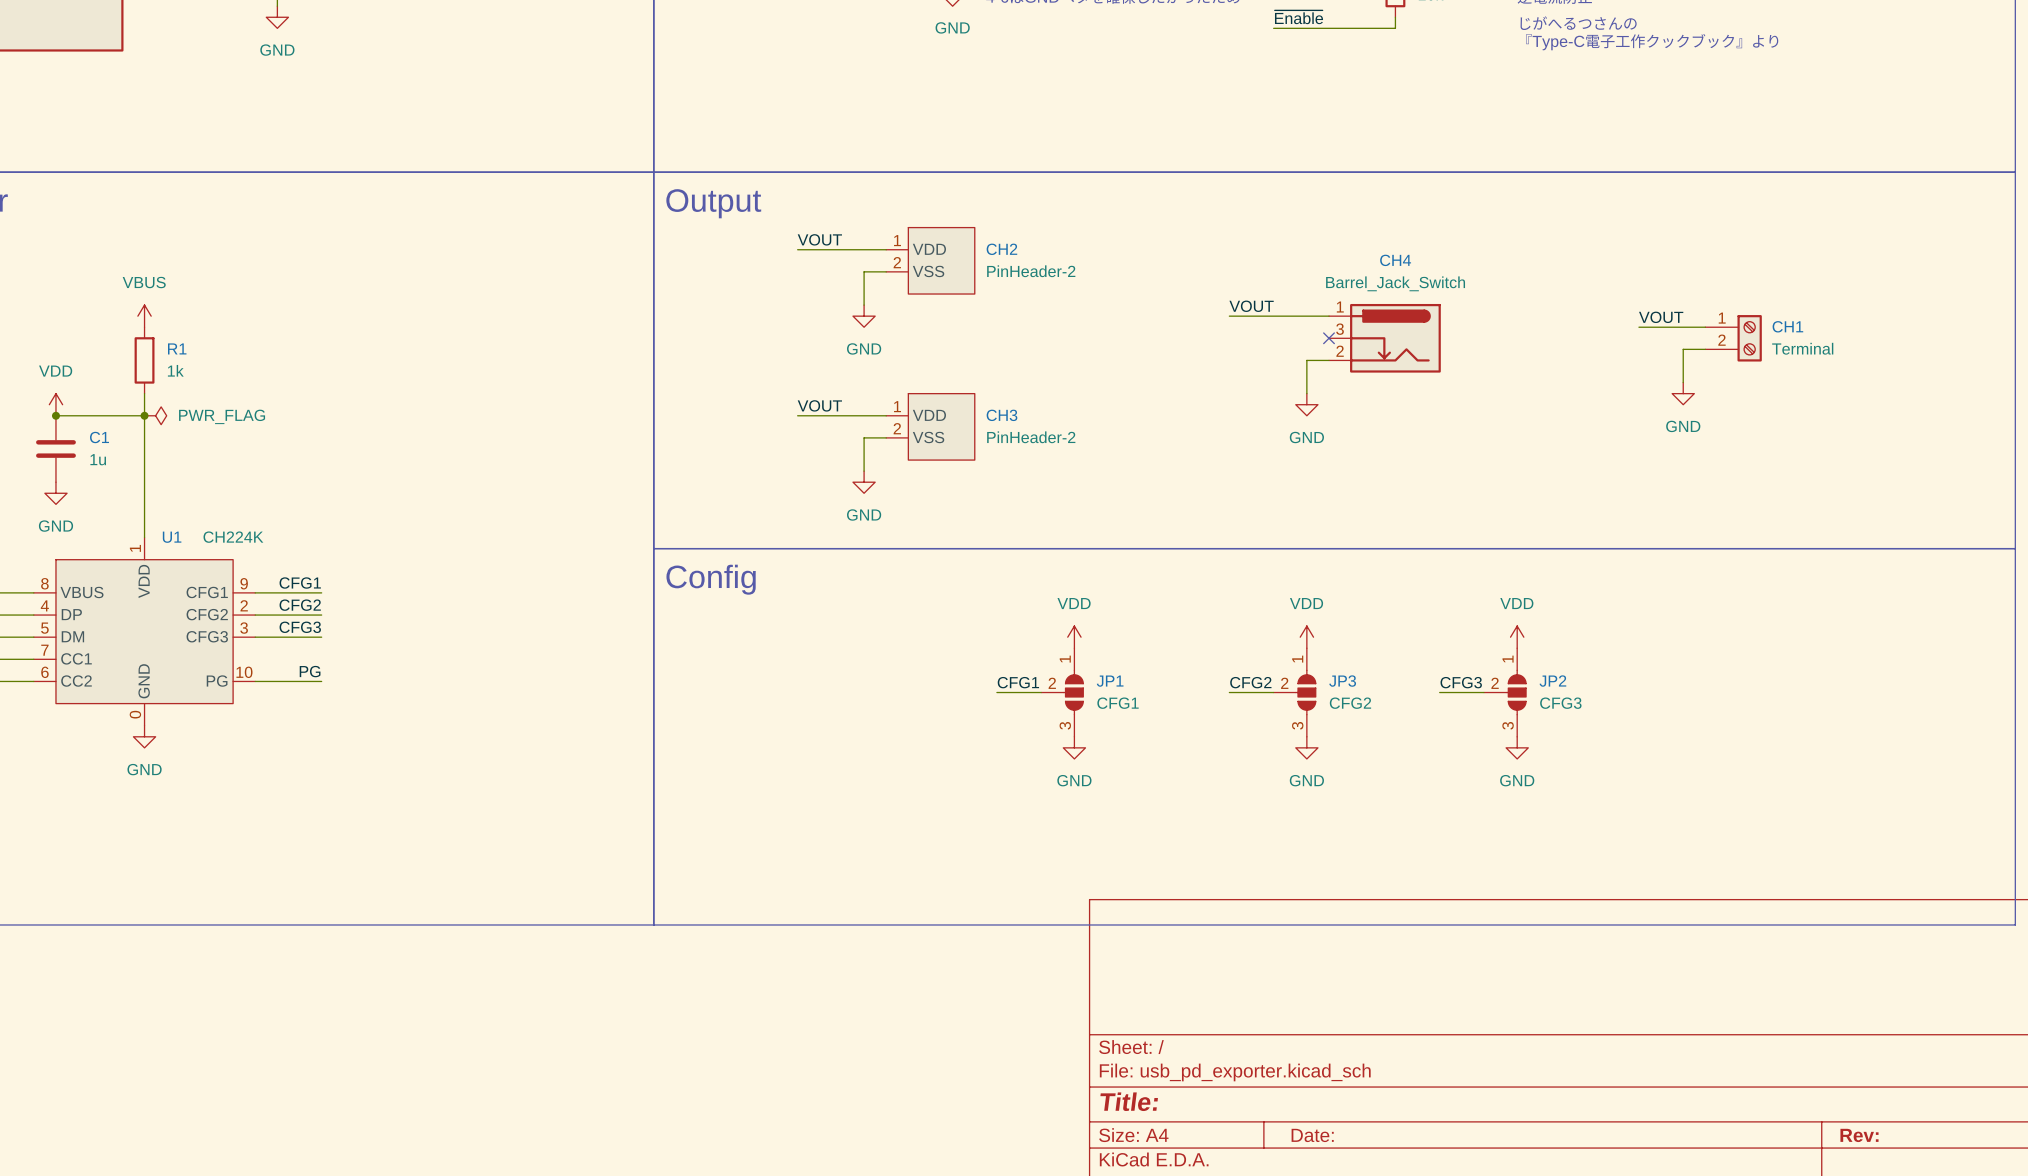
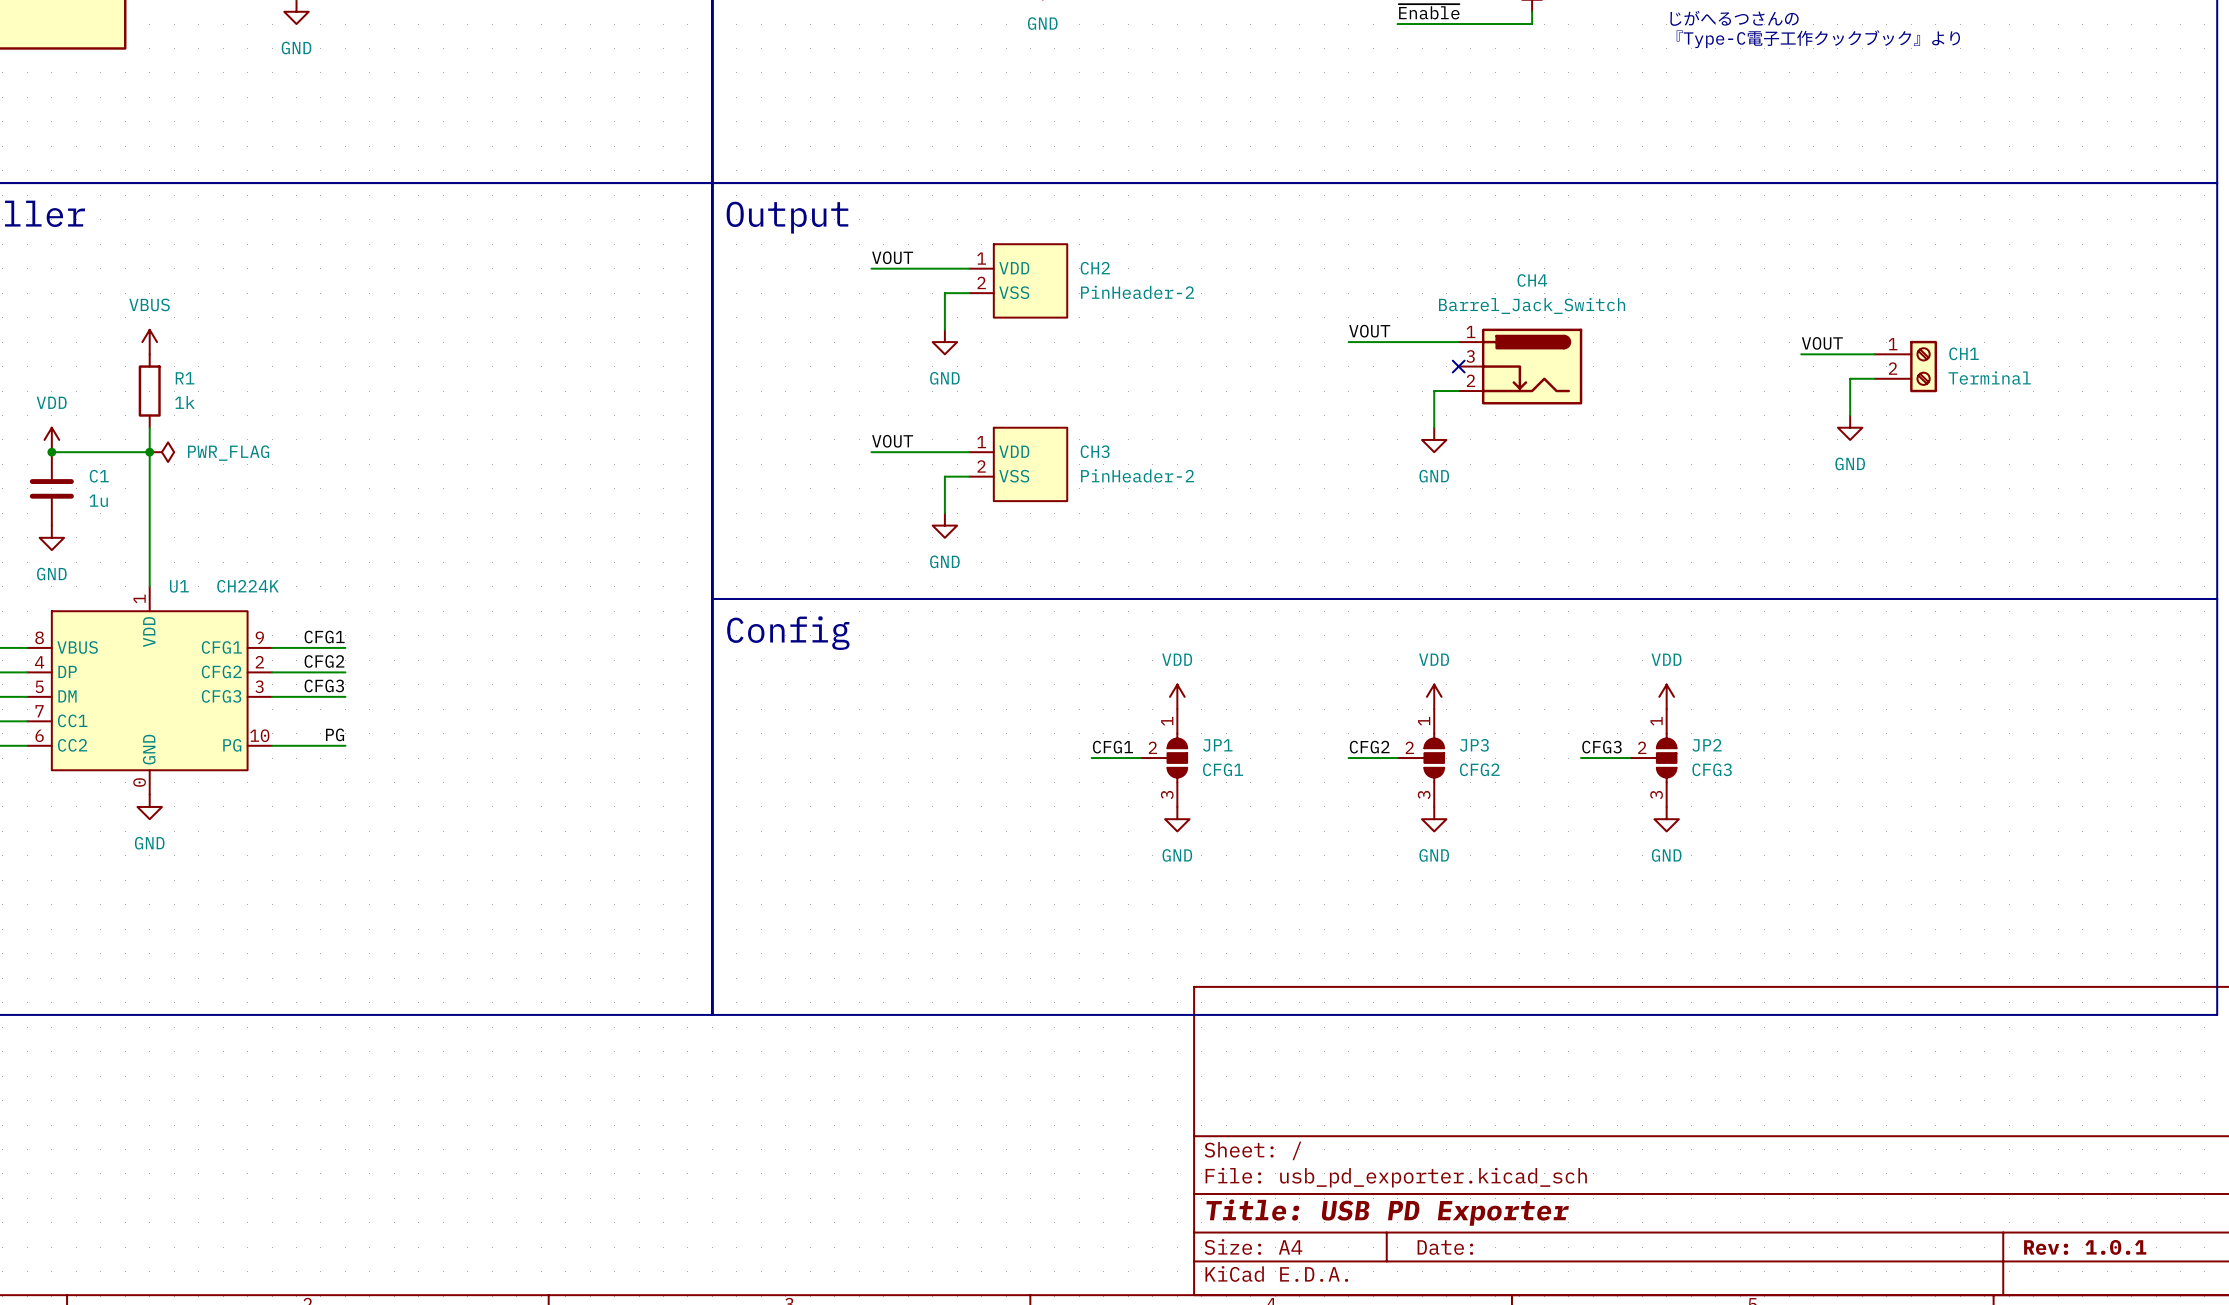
title block: Title: (1129, 1101) -> Title: USB PD Exporter (1387, 1212)
title block: Rev: (1859, 1135) -> Rev: 1.0.1 (2085, 1247)

